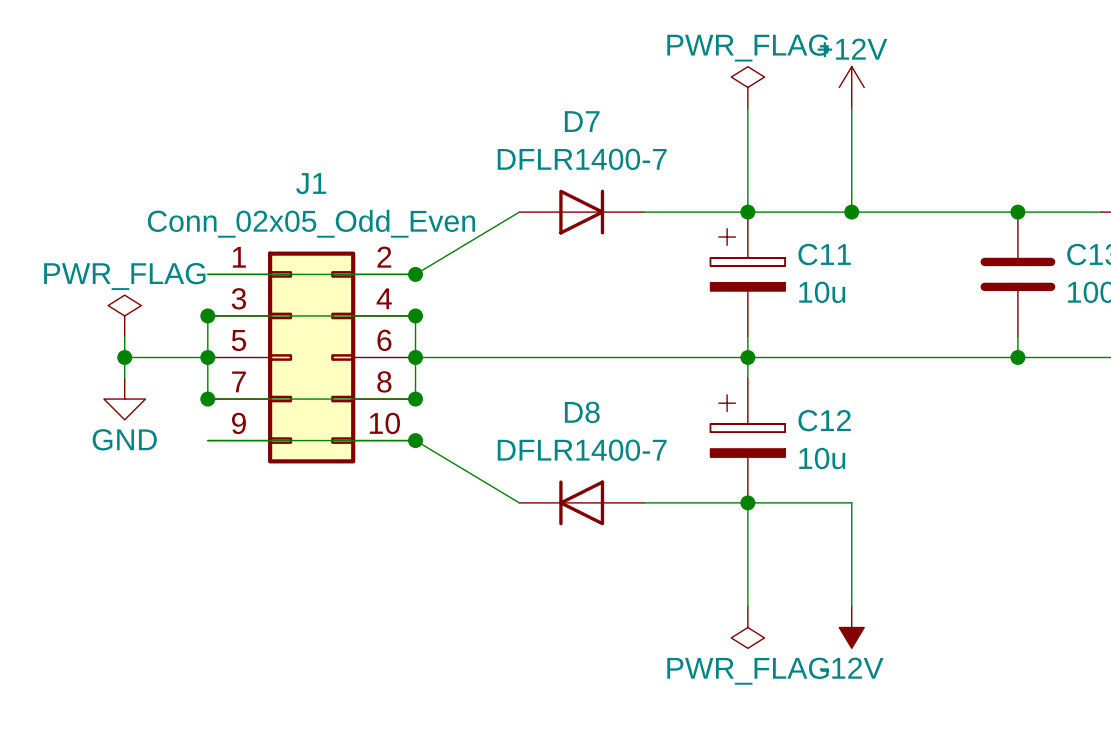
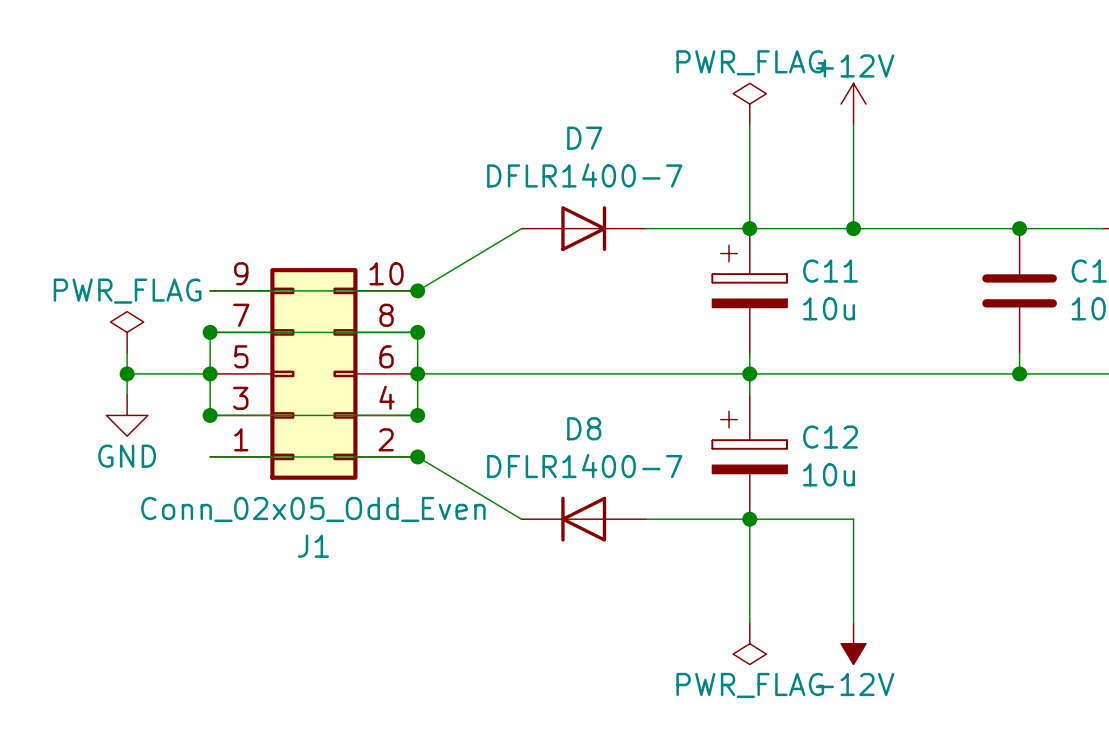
J1 flip: as is (311, 357) -> up-down (313, 373)

